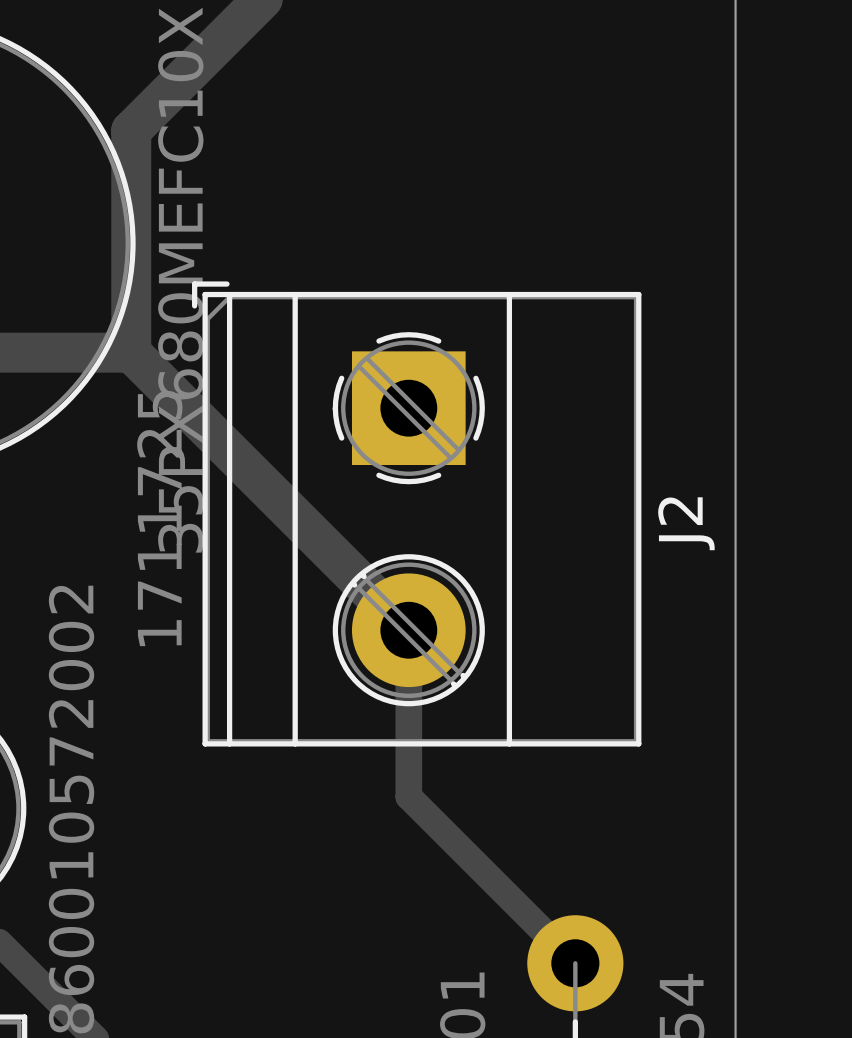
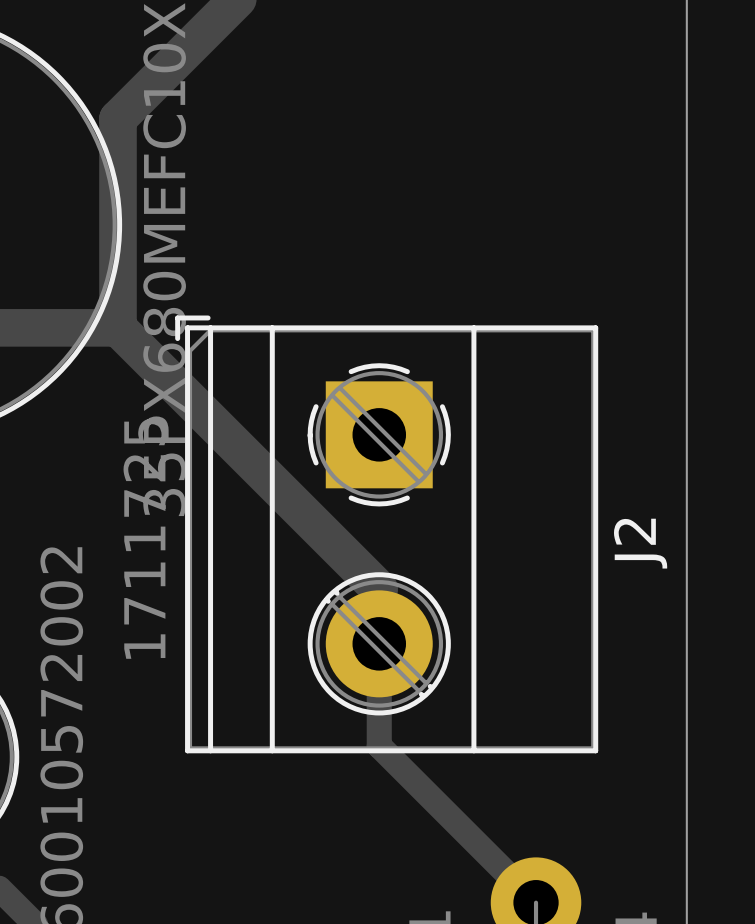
J2 position: (416, 513) -> (386, 534)

